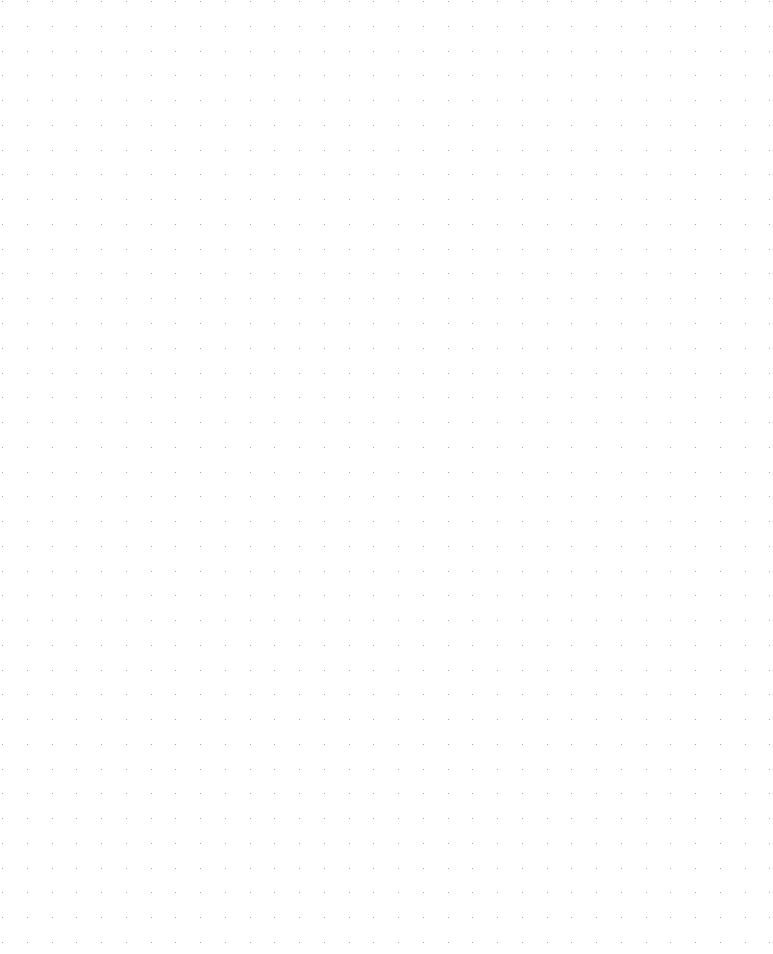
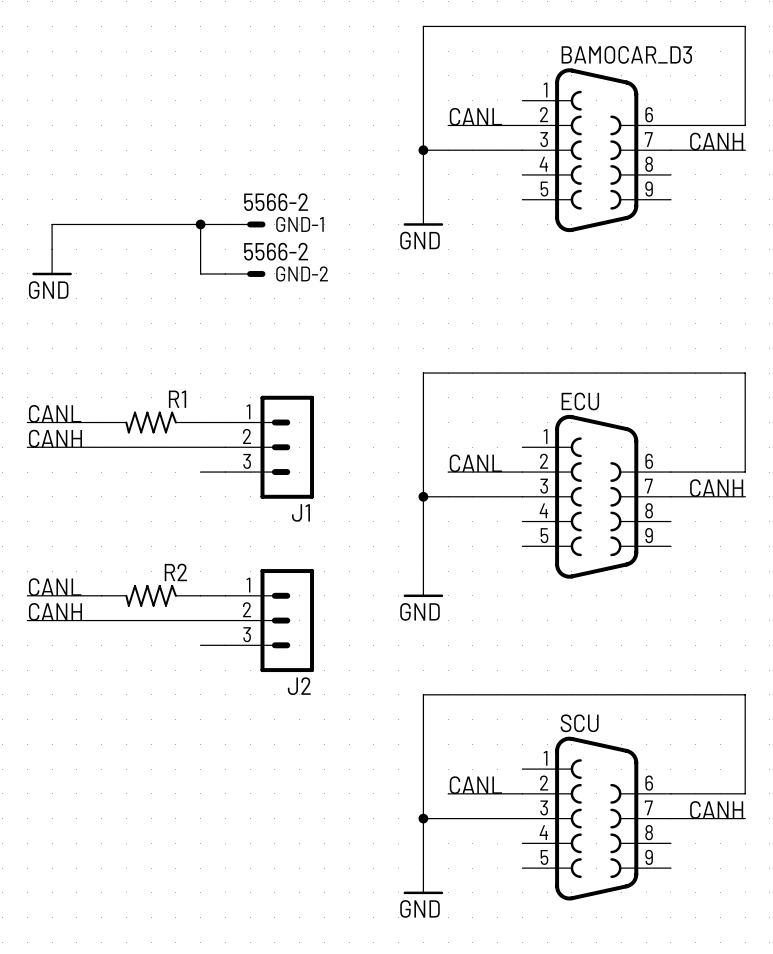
label: none -> CANL (475, 116)
wire: none -> (448, 125) (522, 125)
wire: none -> (670, 125) (745, 125) (745, 26) (423, 26) (423, 199)
label: none -> CANH (716, 141)
wire: none -> (423, 150) (522, 150)
junction: none -> (423, 150)
BAMOCAR_D3: none -> (596, 150)
wire: none -> (670, 150) (745, 150)
power symbol: none -> GND (423, 212)
wire: none -> (200, 224) (200, 273) (225, 273)
junction: none -> (200, 224)
wire: none -> (225, 224) (52, 224) (52, 249)
GND-1: none -> 5566-2 (245, 224)
power symbol: none -> GND (52, 262)
GND-2: none -> 5566-2 (245, 273)
label: none -> CANL (55, 413)
wire: none -> (27, 422) (101, 422)
R1: none -> (151, 422)
wire: none -> (200, 422) (225, 422)
label: none -> CANH (55, 438)
wire: none -> (27, 447) (225, 447)
J1: none -> (269, 447)
label: none -> CANL (475, 463)
wire: none -> (200, 472) (225, 472)
wire: none -> (448, 472) (522, 472)
wire: none -> (670, 472) (745, 472) (745, 373) (423, 373) (423, 571)
label: none -> CANH (716, 488)
wire: none -> (423, 496) (522, 496)
junction: none -> (423, 496)
ECU: none -> (596, 496)
wire: none -> (670, 496) (745, 496)
power symbol: none -> GND (423, 584)
label: none -> CANL (55, 587)
wire: none -> (27, 595) (101, 595)
R2: none -> (151, 595)
wire: none -> (200, 595) (225, 595)
label: none -> CANH (55, 611)
wire: none -> (27, 620) (225, 620)
J2: none -> (269, 620)
wire: none -> (200, 645) (225, 645)
label: none -> CANL (475, 785)
wire: none -> (448, 793) (522, 793)
wire: none -> (670, 793) (745, 793) (745, 694) (423, 694) (423, 868)
label: none -> CANH (716, 809)
wire: none -> (423, 818) (522, 818)
junction: none -> (423, 818)
SCU: none -> (596, 818)
wire: none -> (670, 818) (745, 818)
power symbol: none -> GND (423, 881)

